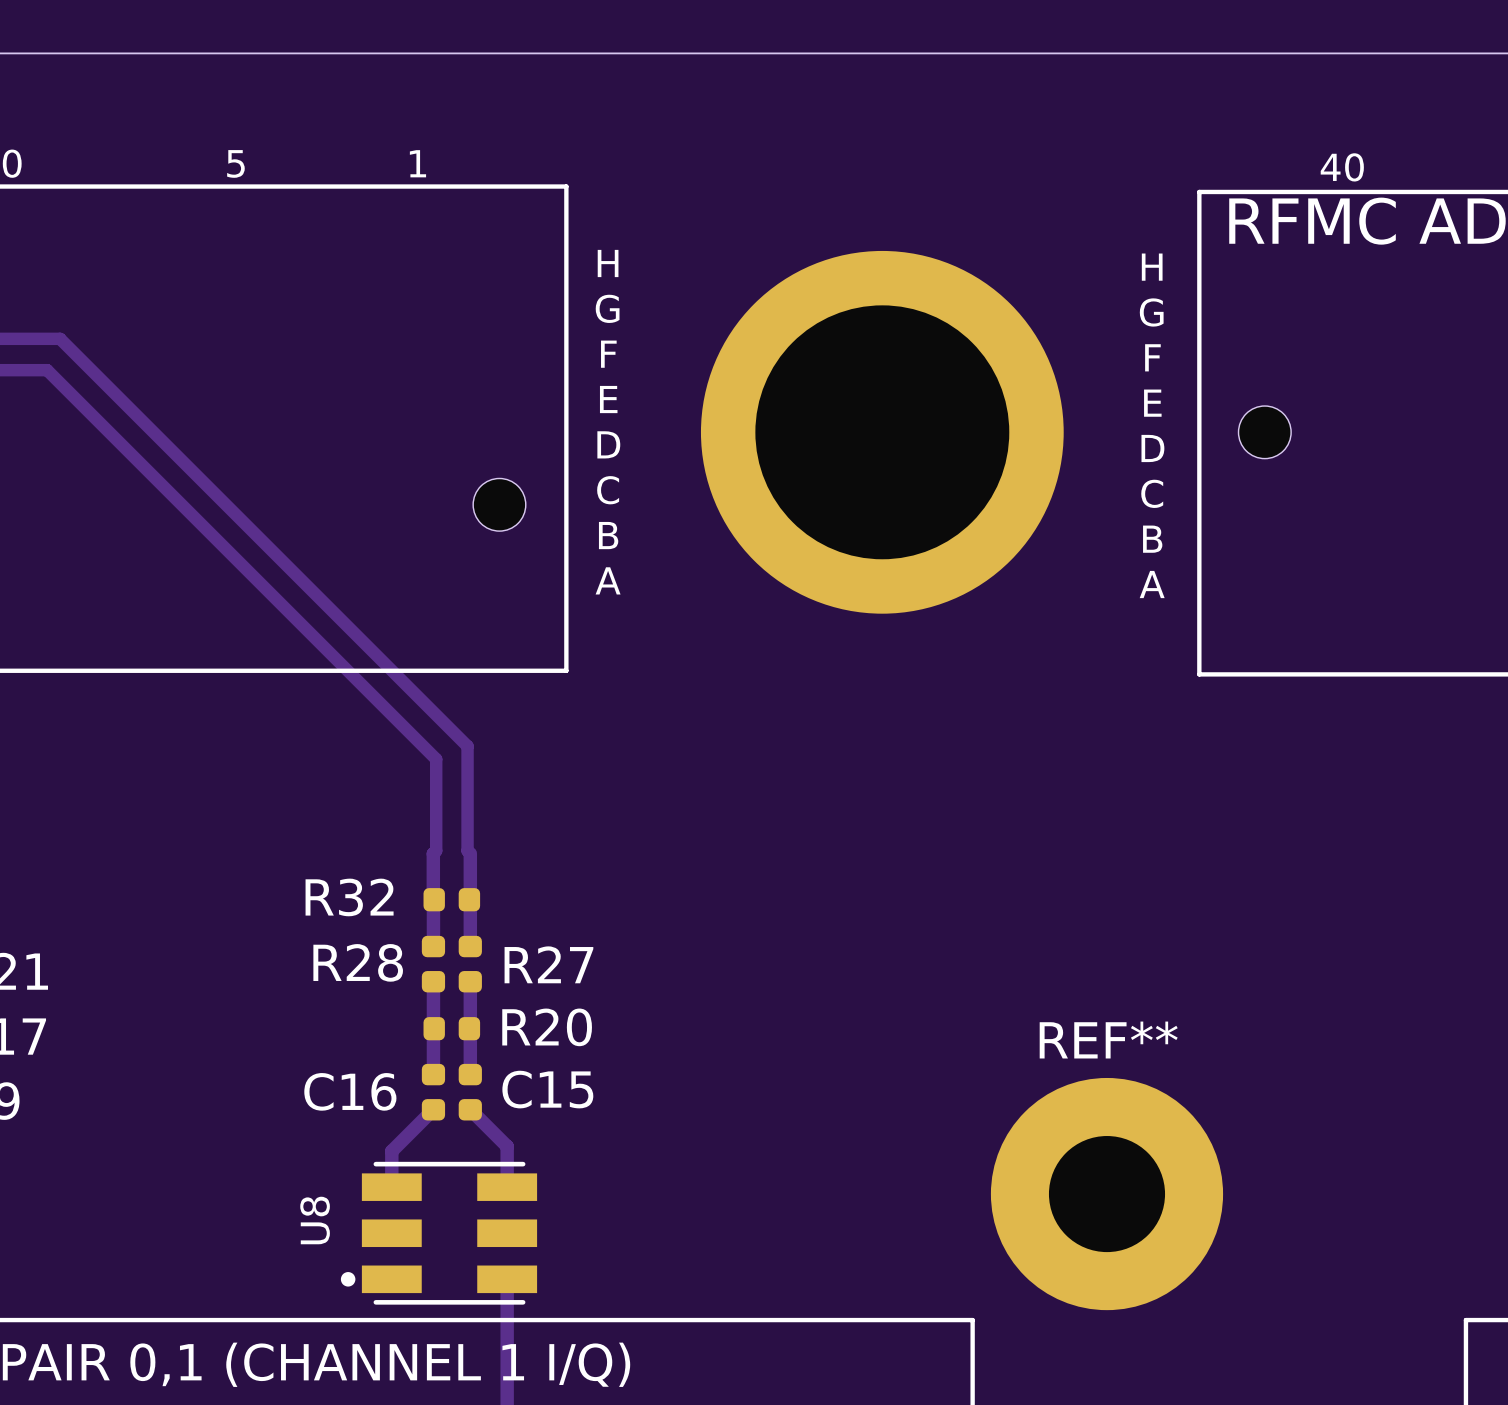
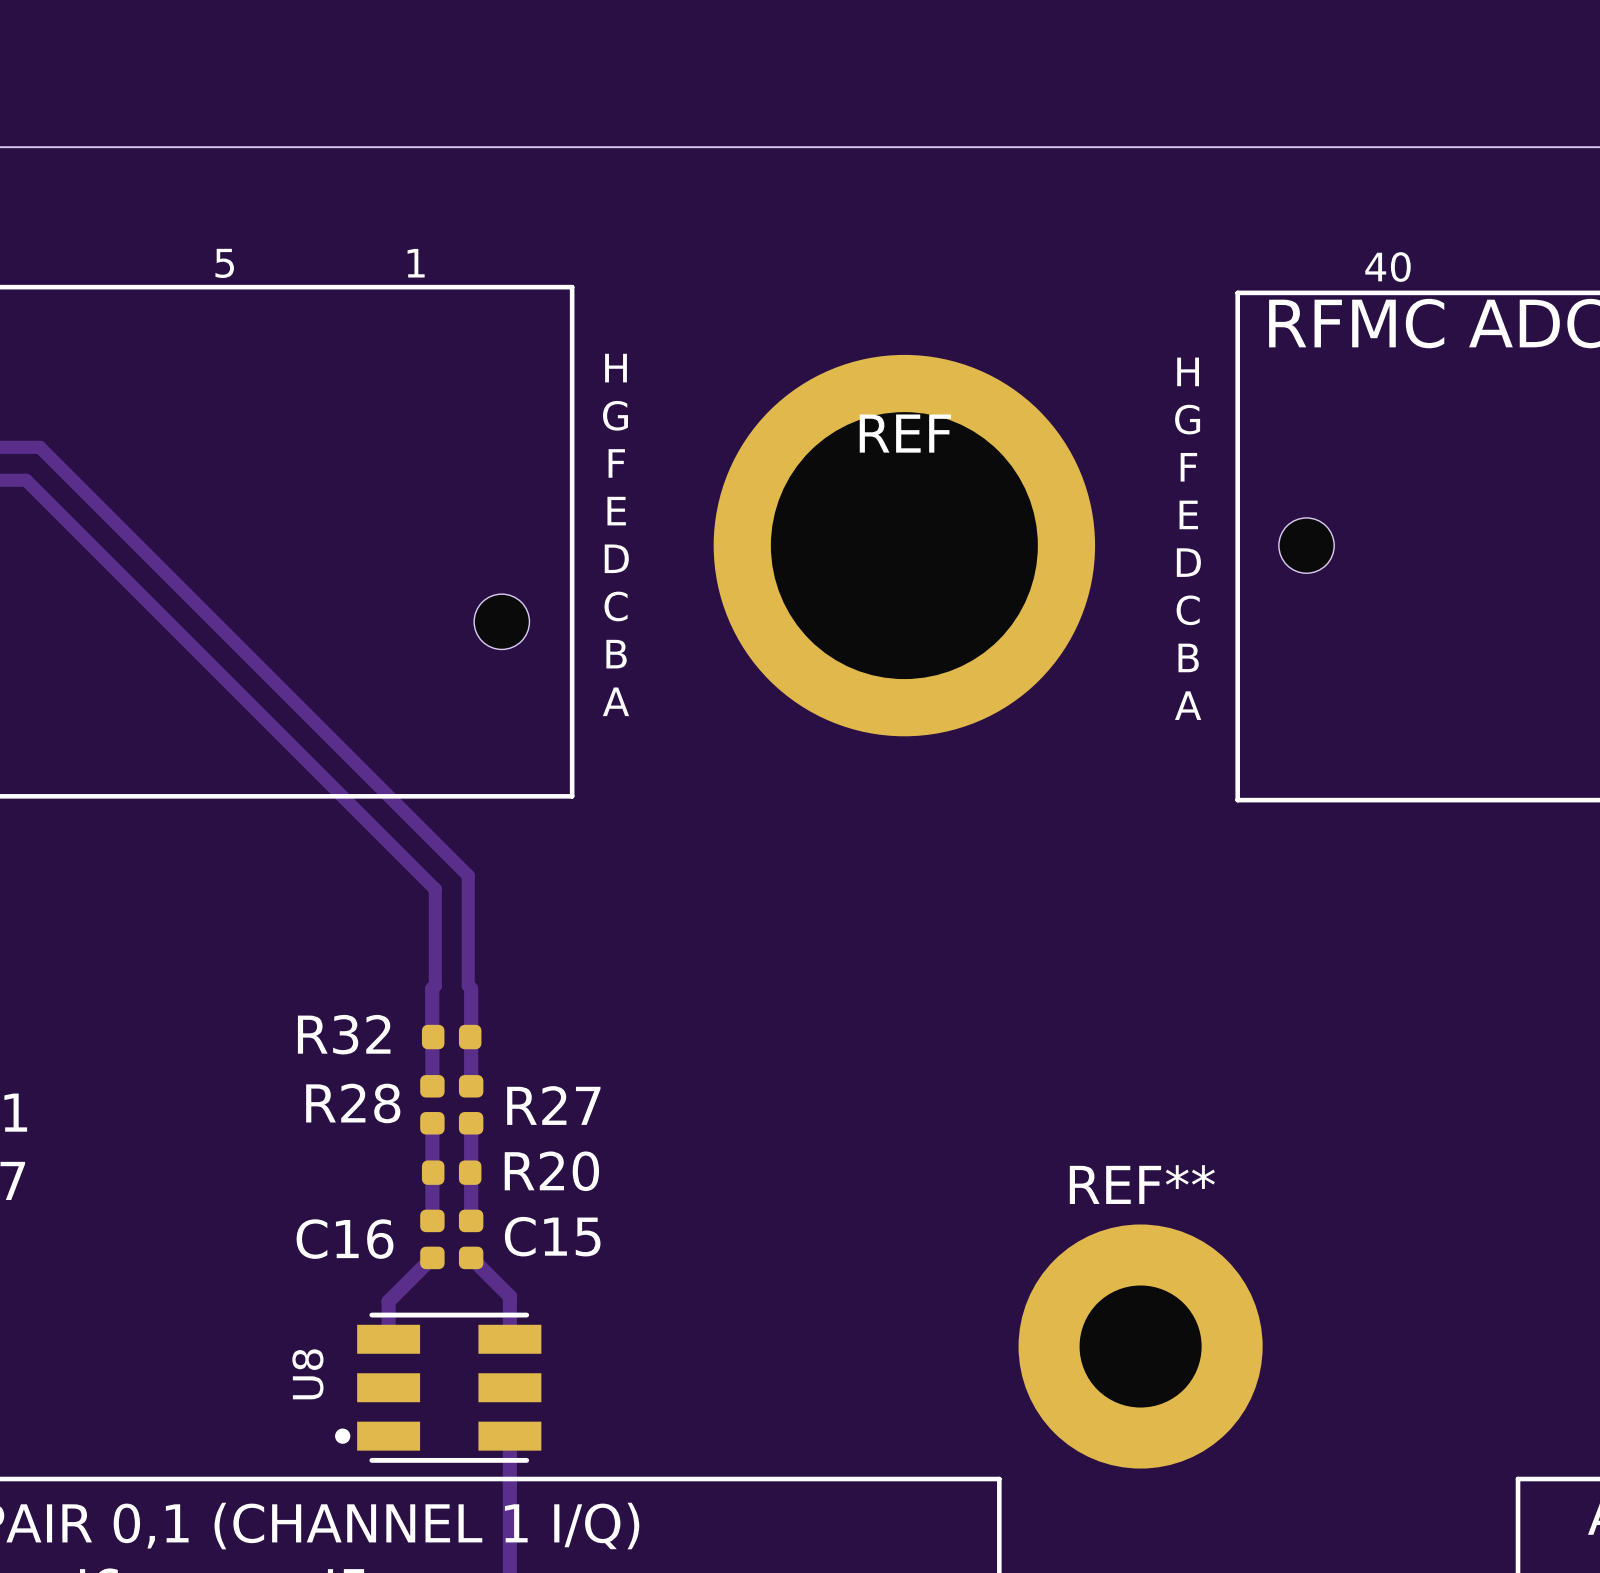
REF name: none -> REF (905, 433)

